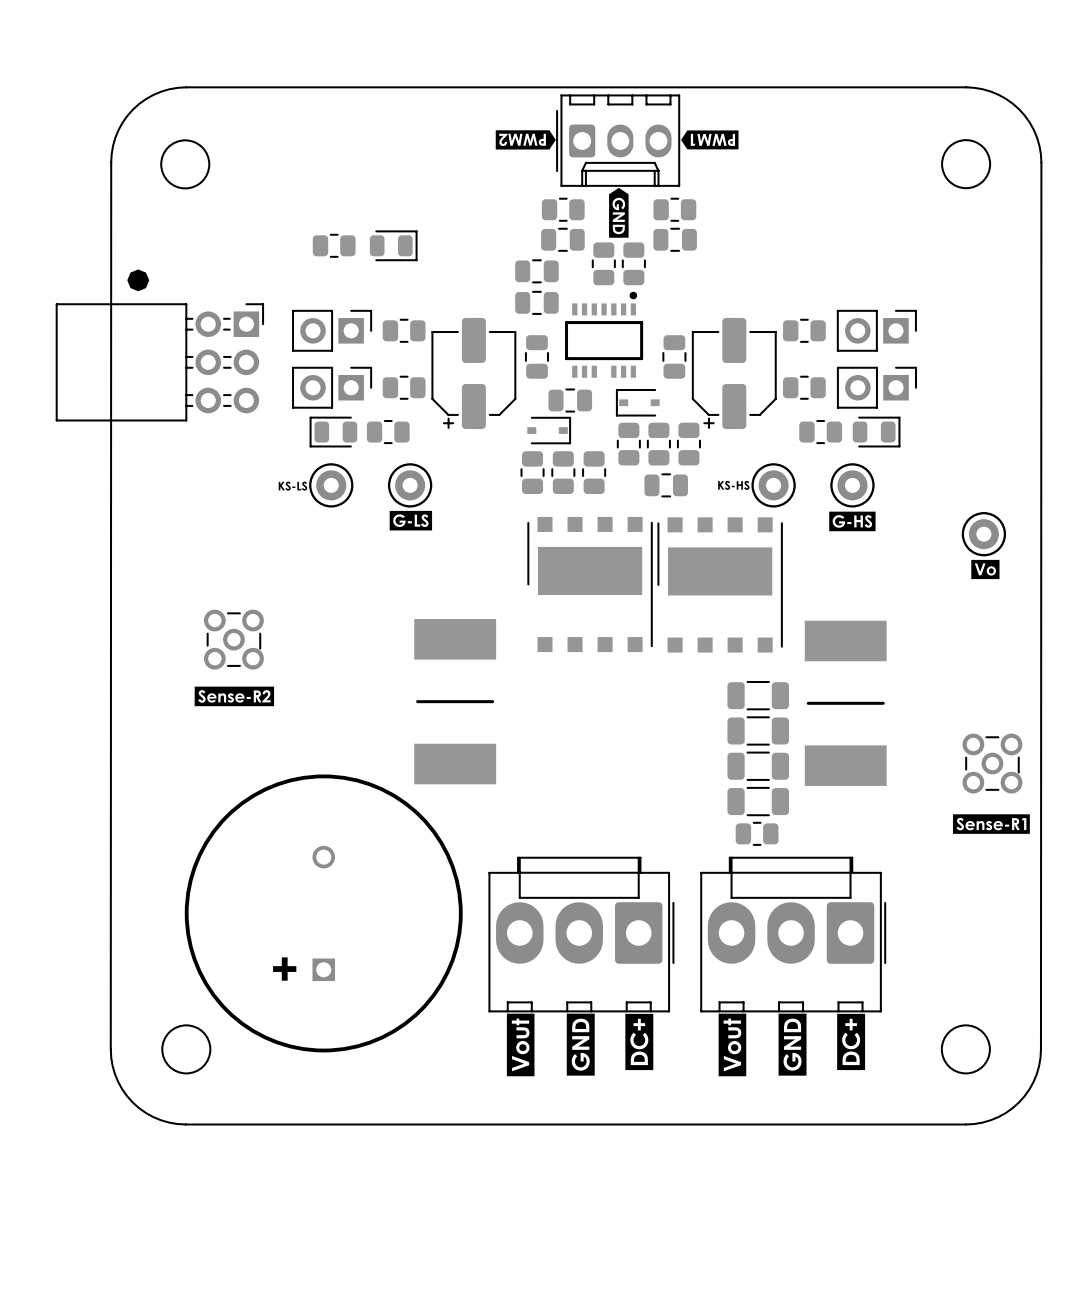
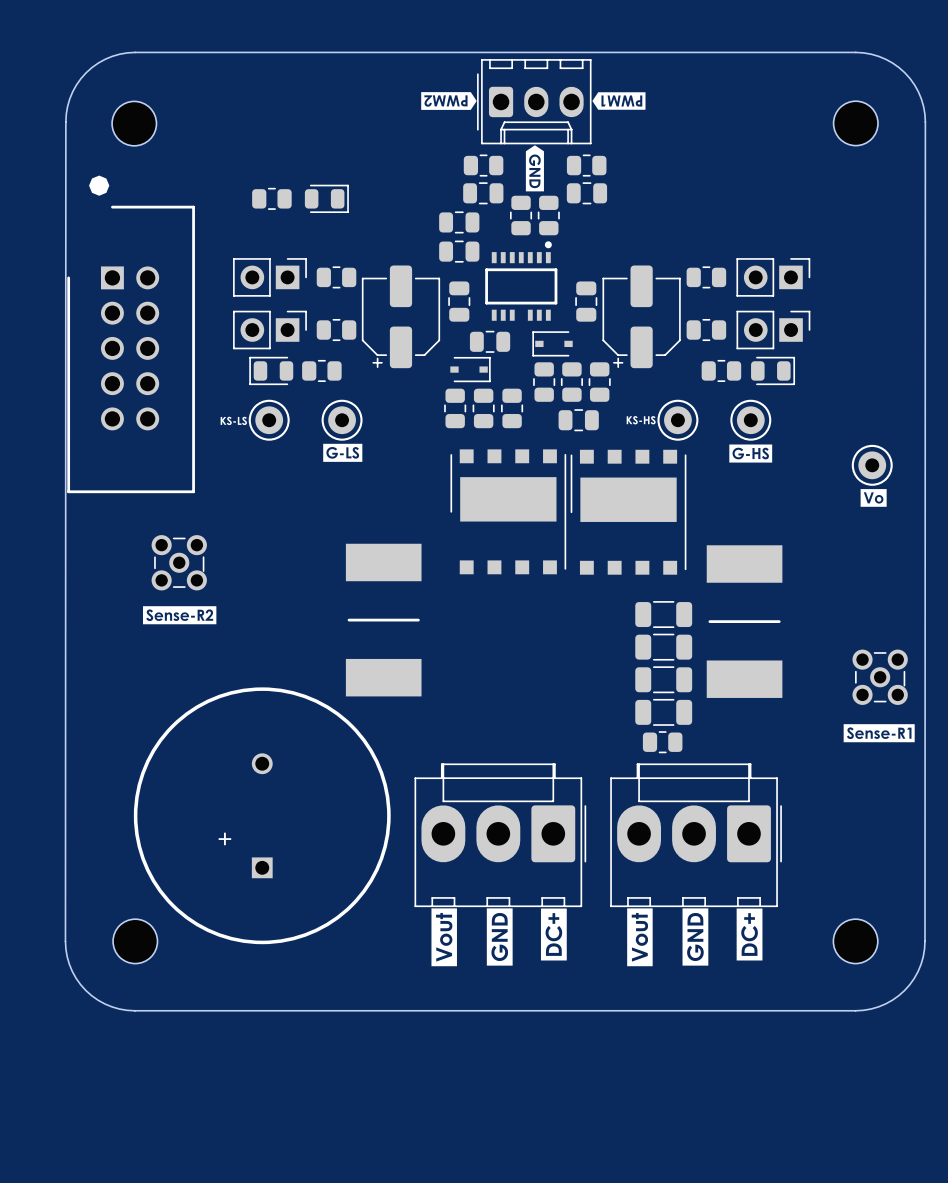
drawing position: (138, 280) -> (99, 185)
part: (159, 362) -> none
part: none -> (131, 349)
text: none -> + (224, 838)
drawing: [273, 957, 297, 981] -> none

